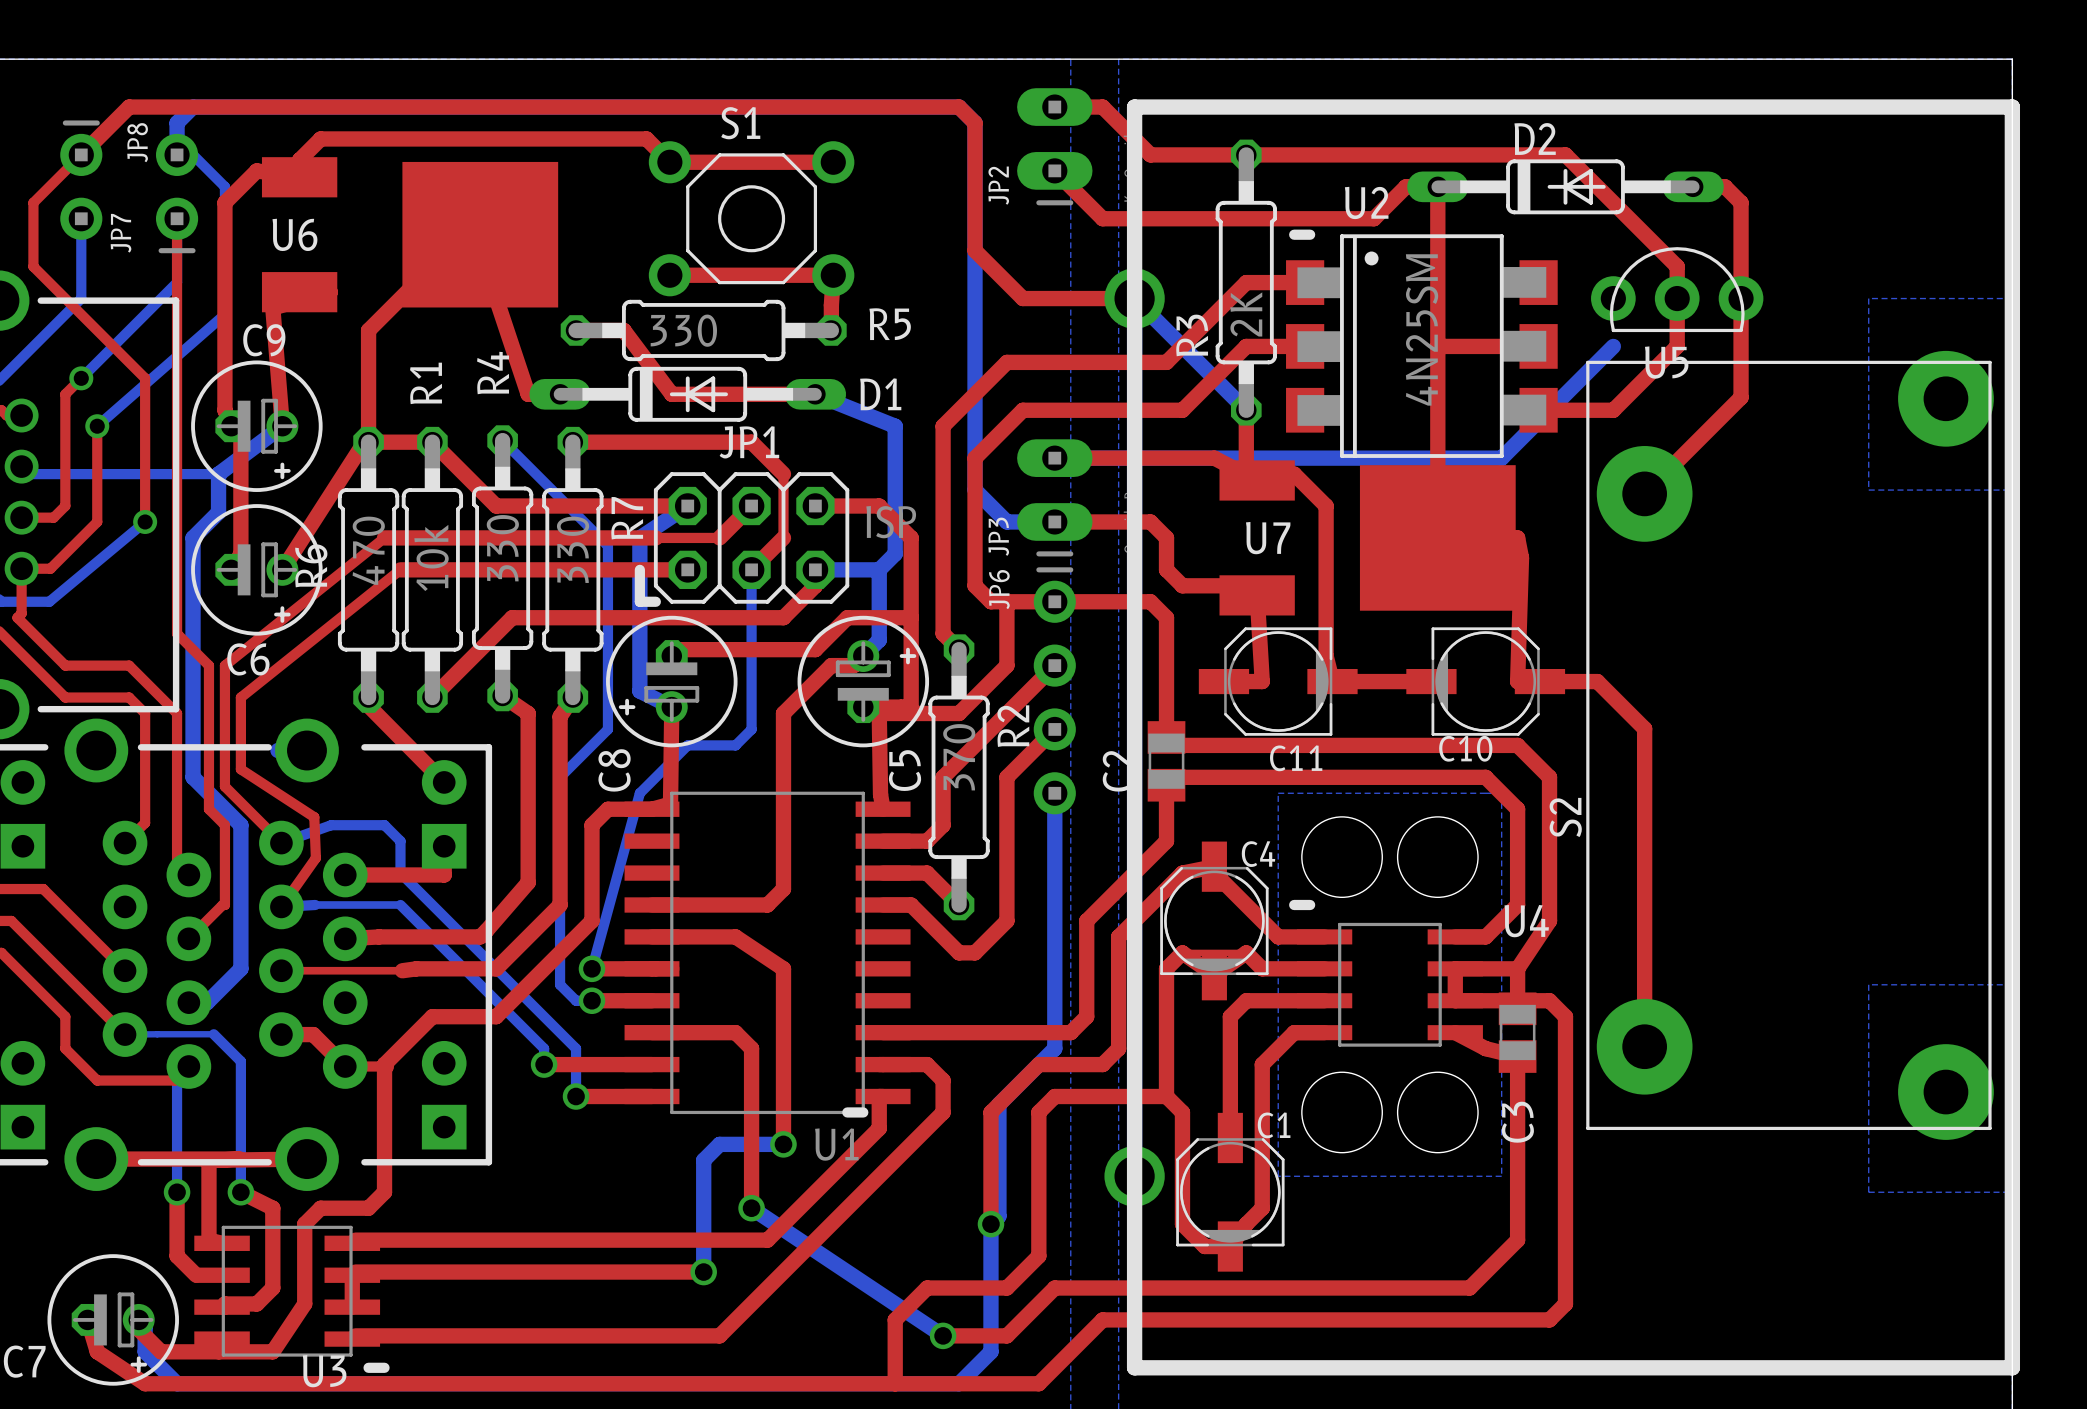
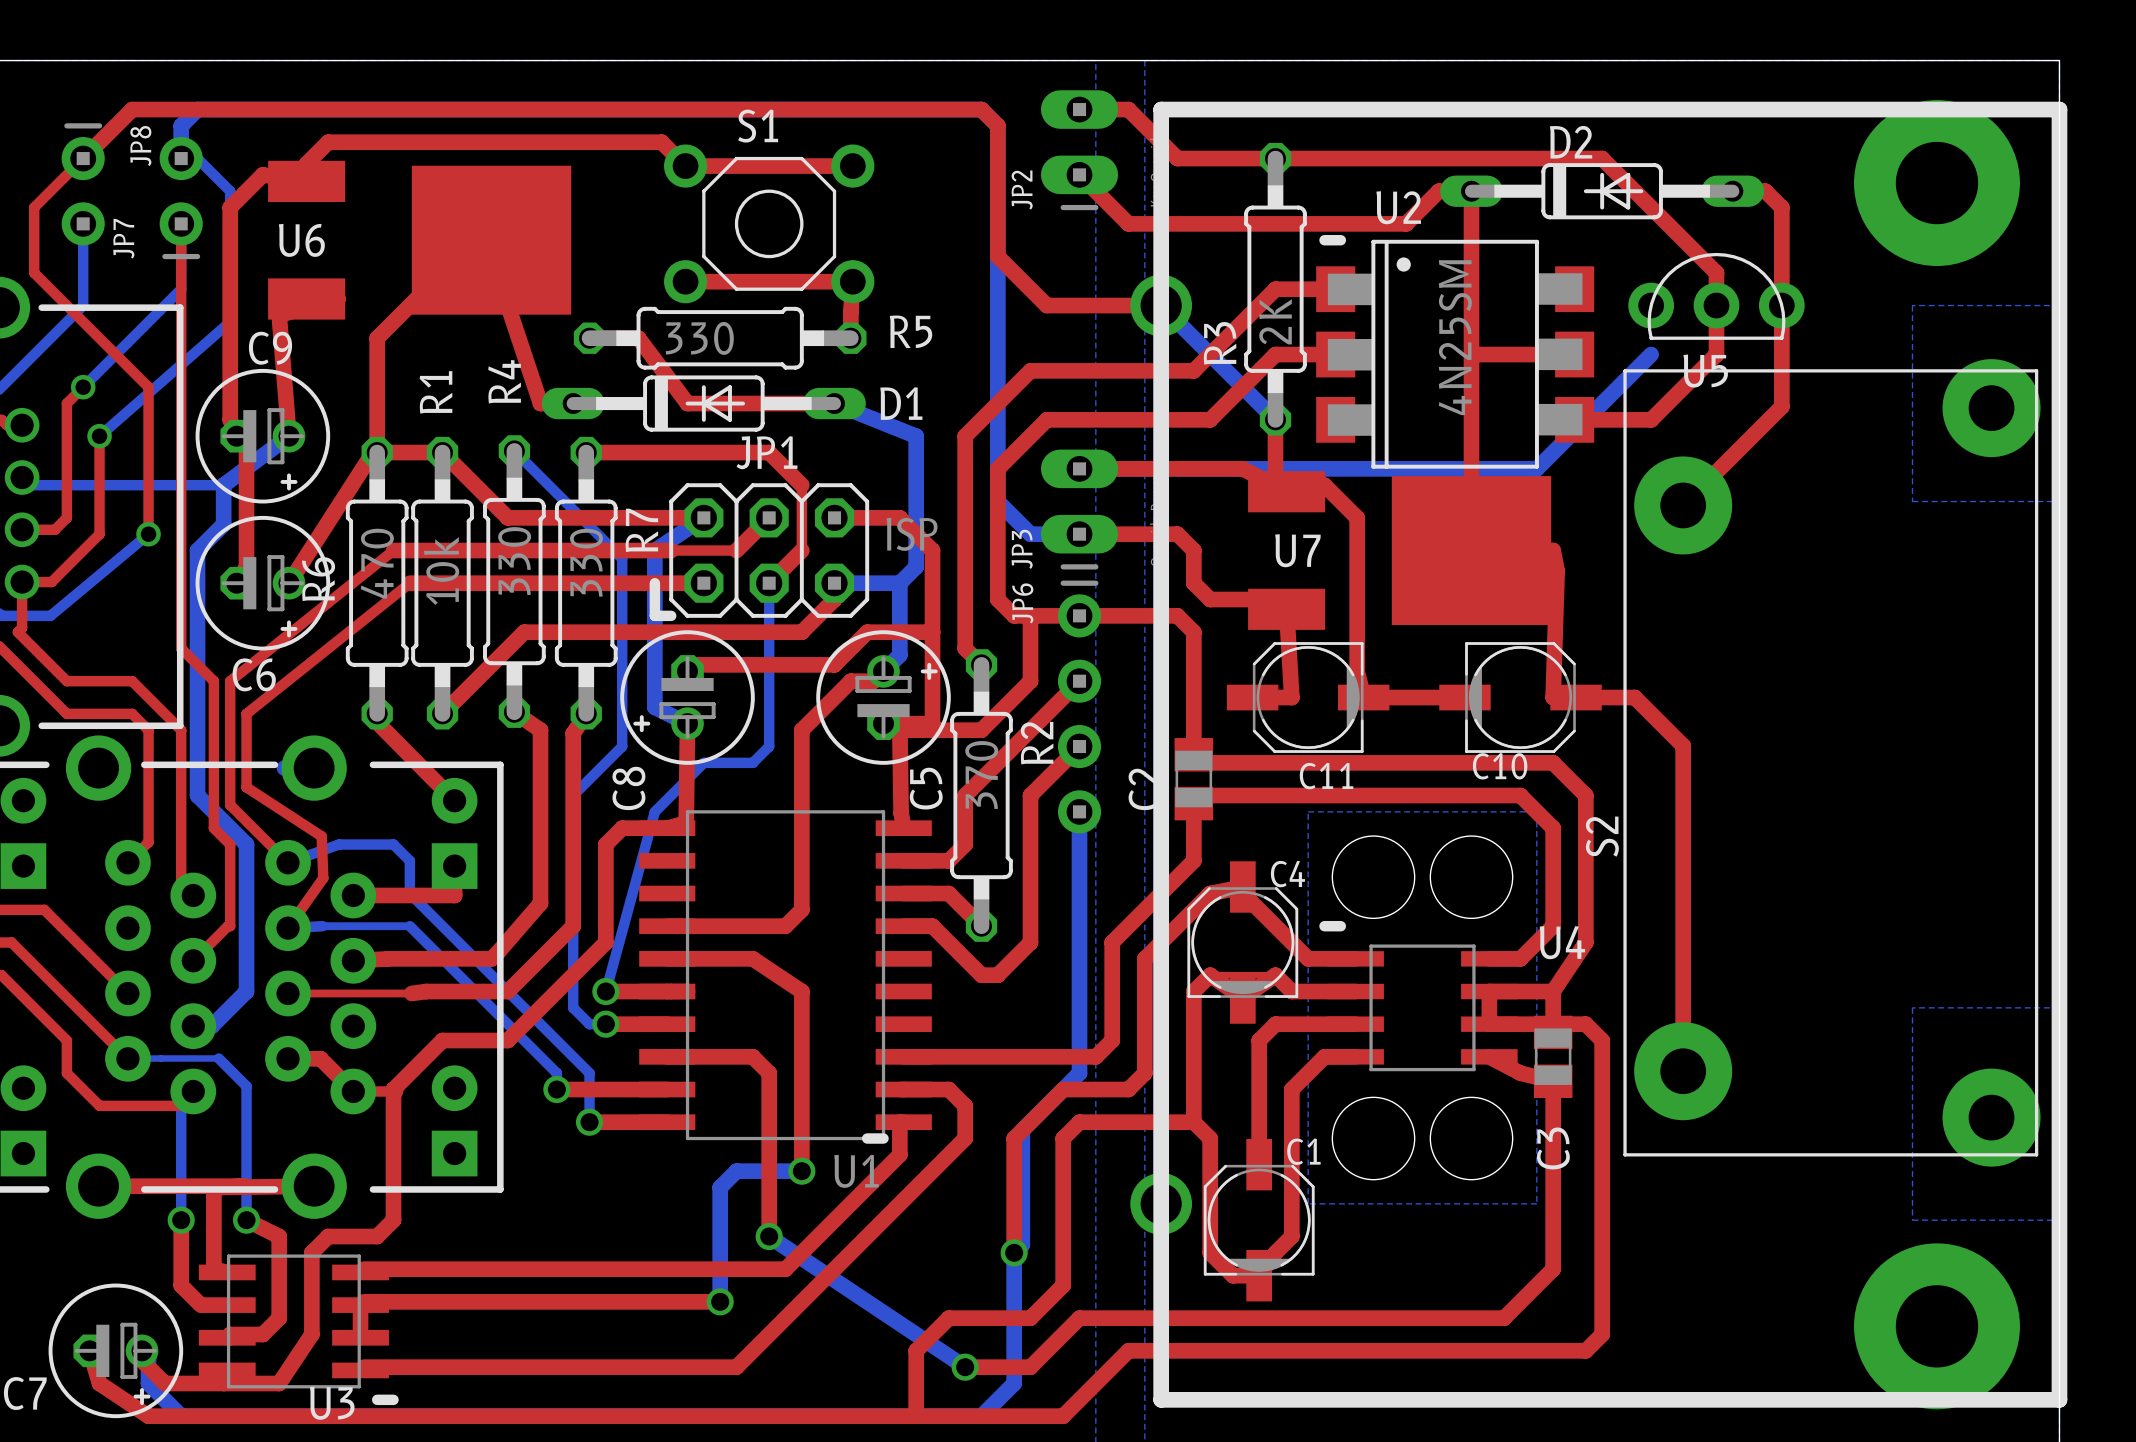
via: none -> (1936, 183)
via: none -> (1936, 1326)

